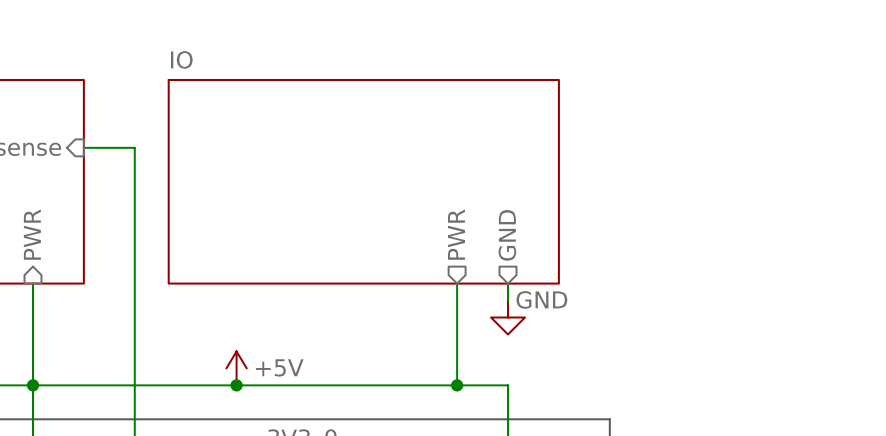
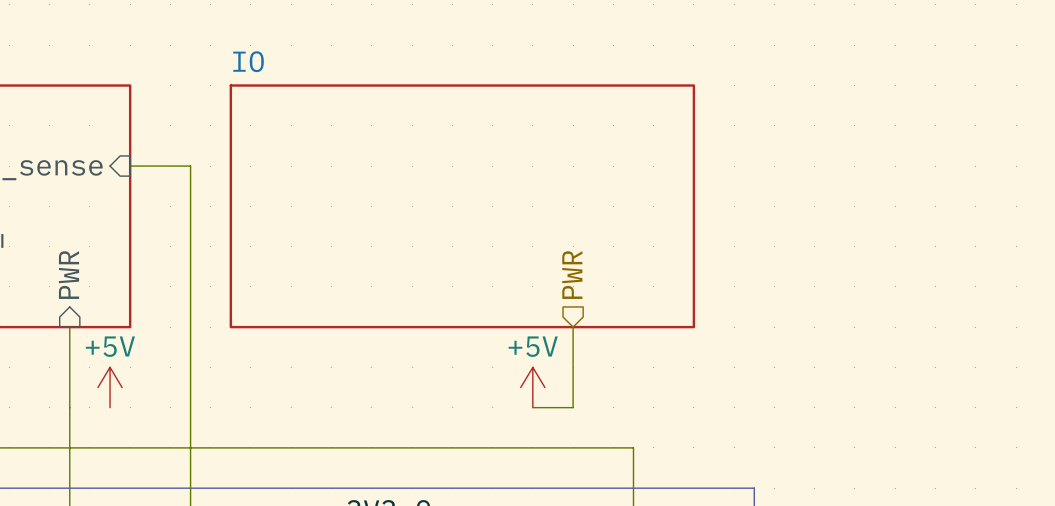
hierarchical label: GND (507, 235) -> none
wire: (508, 283) (508, 300) -> none
power symbol: GND (508, 317) -> none
power symbol: none -> +5V (110, 387)
power symbol: none -> +5V (532, 387)
wire: (457, 351) (457, 385) -> (573, 407) (532, 407)
power symbol: +5V (236, 368) -> none
junction: (32, 385) -> none
junction: (236, 385) -> none
junction: (457, 385) -> none

